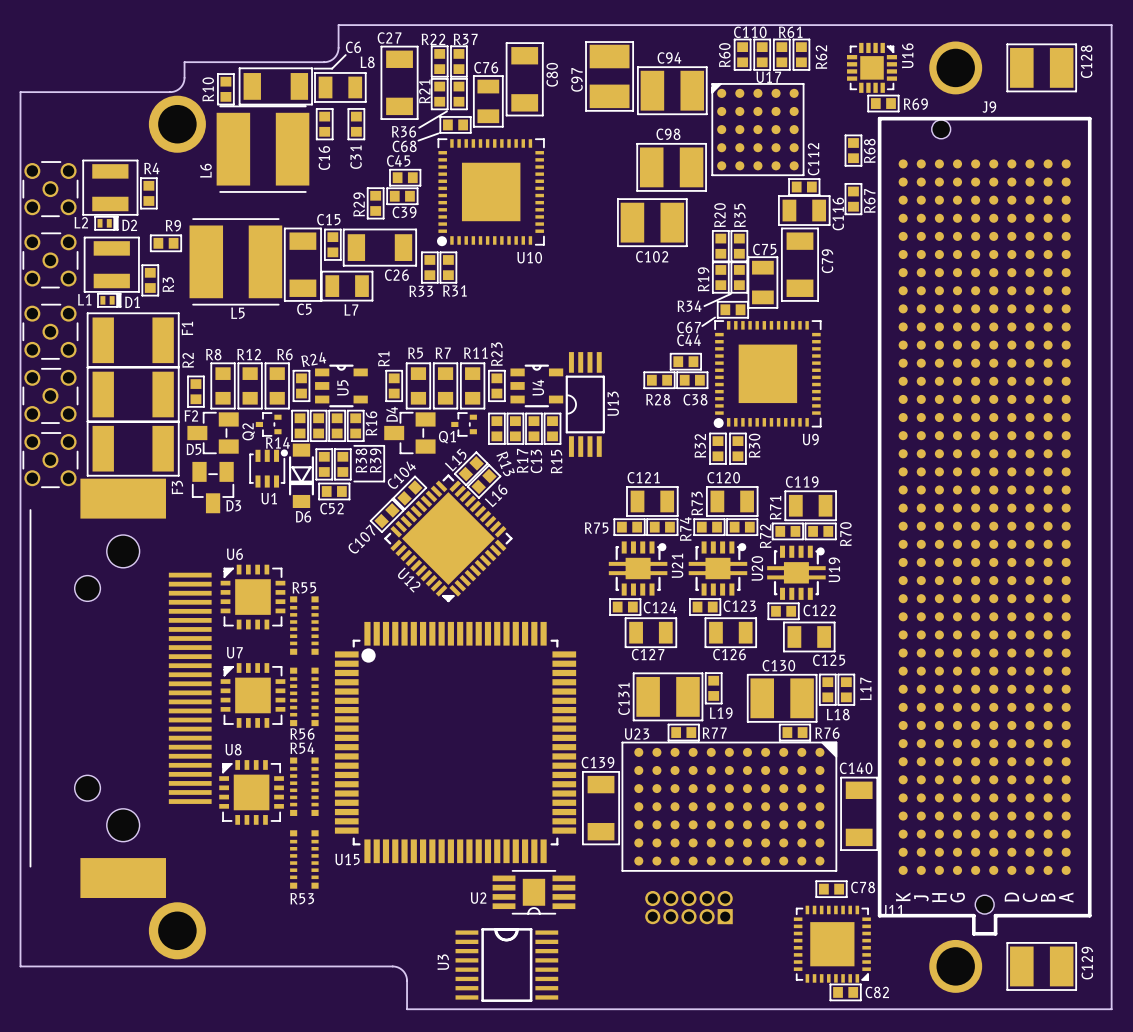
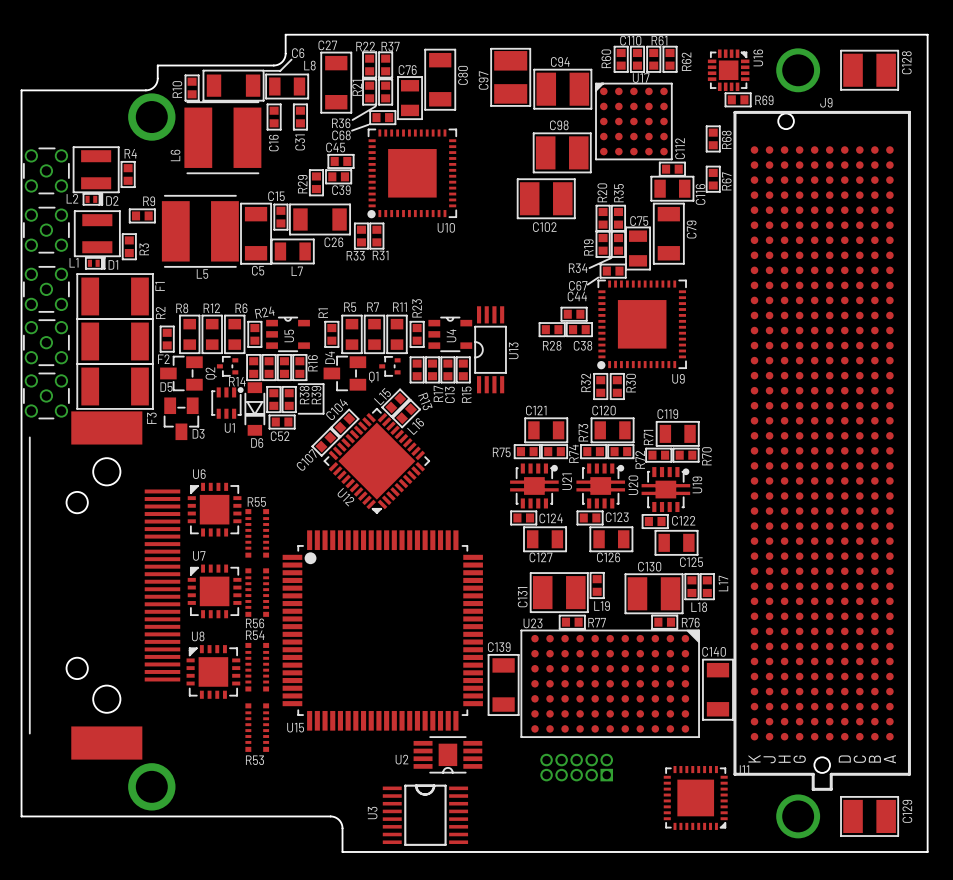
C78: (831, 889) -> none
C82: (845, 992) -> none

